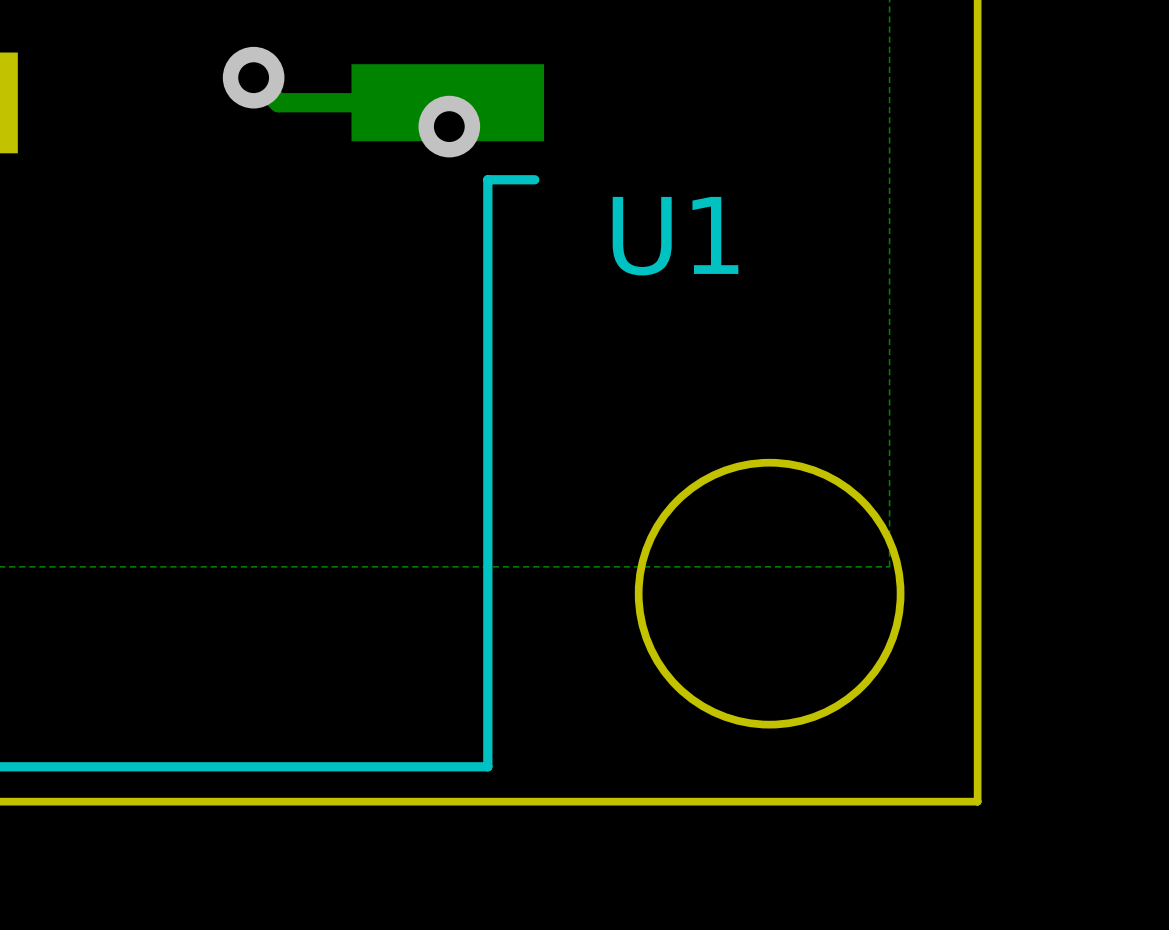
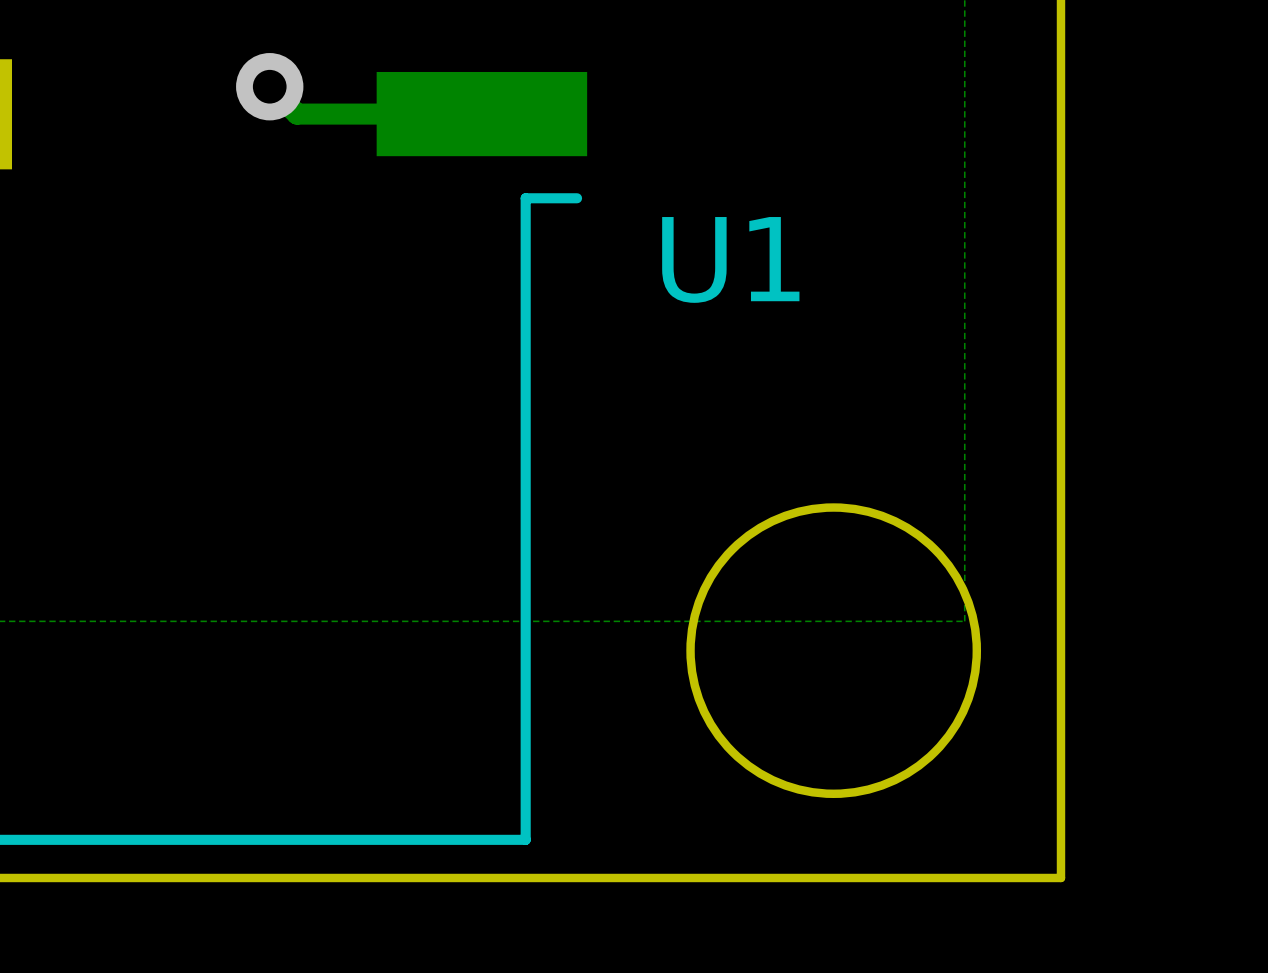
via: (449, 126) -> none

